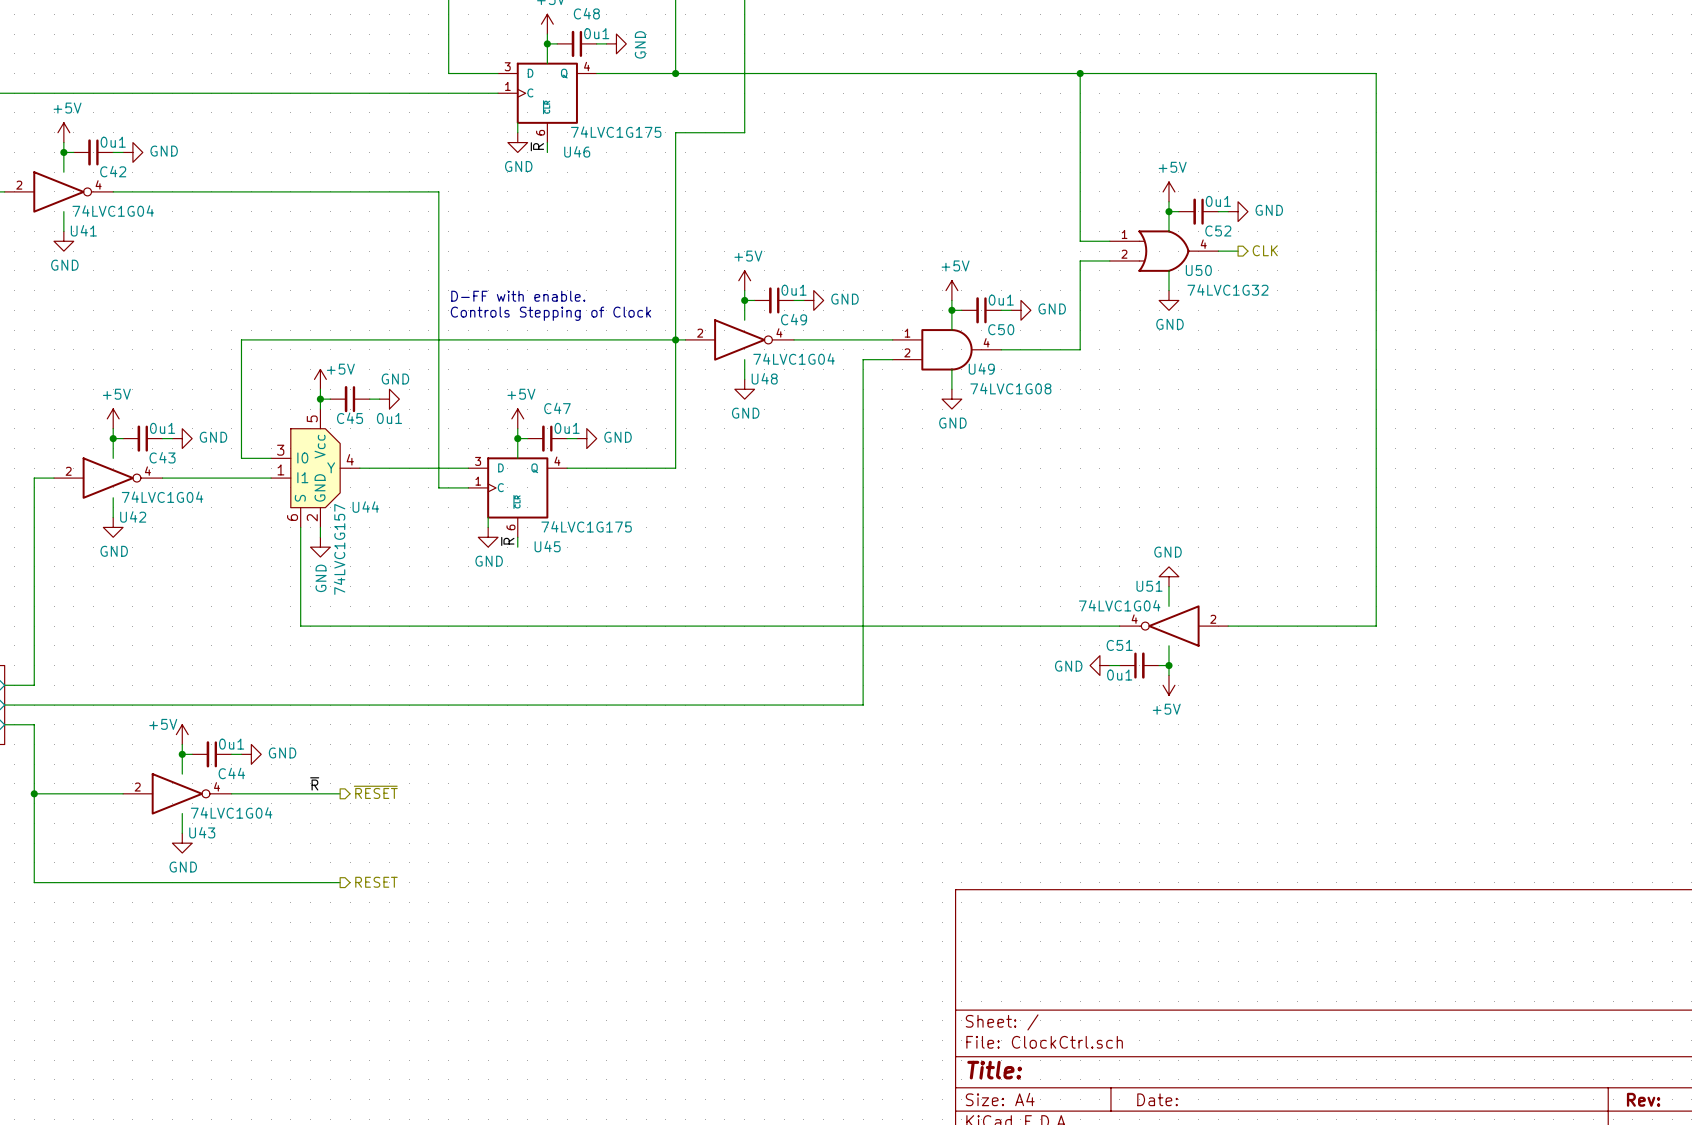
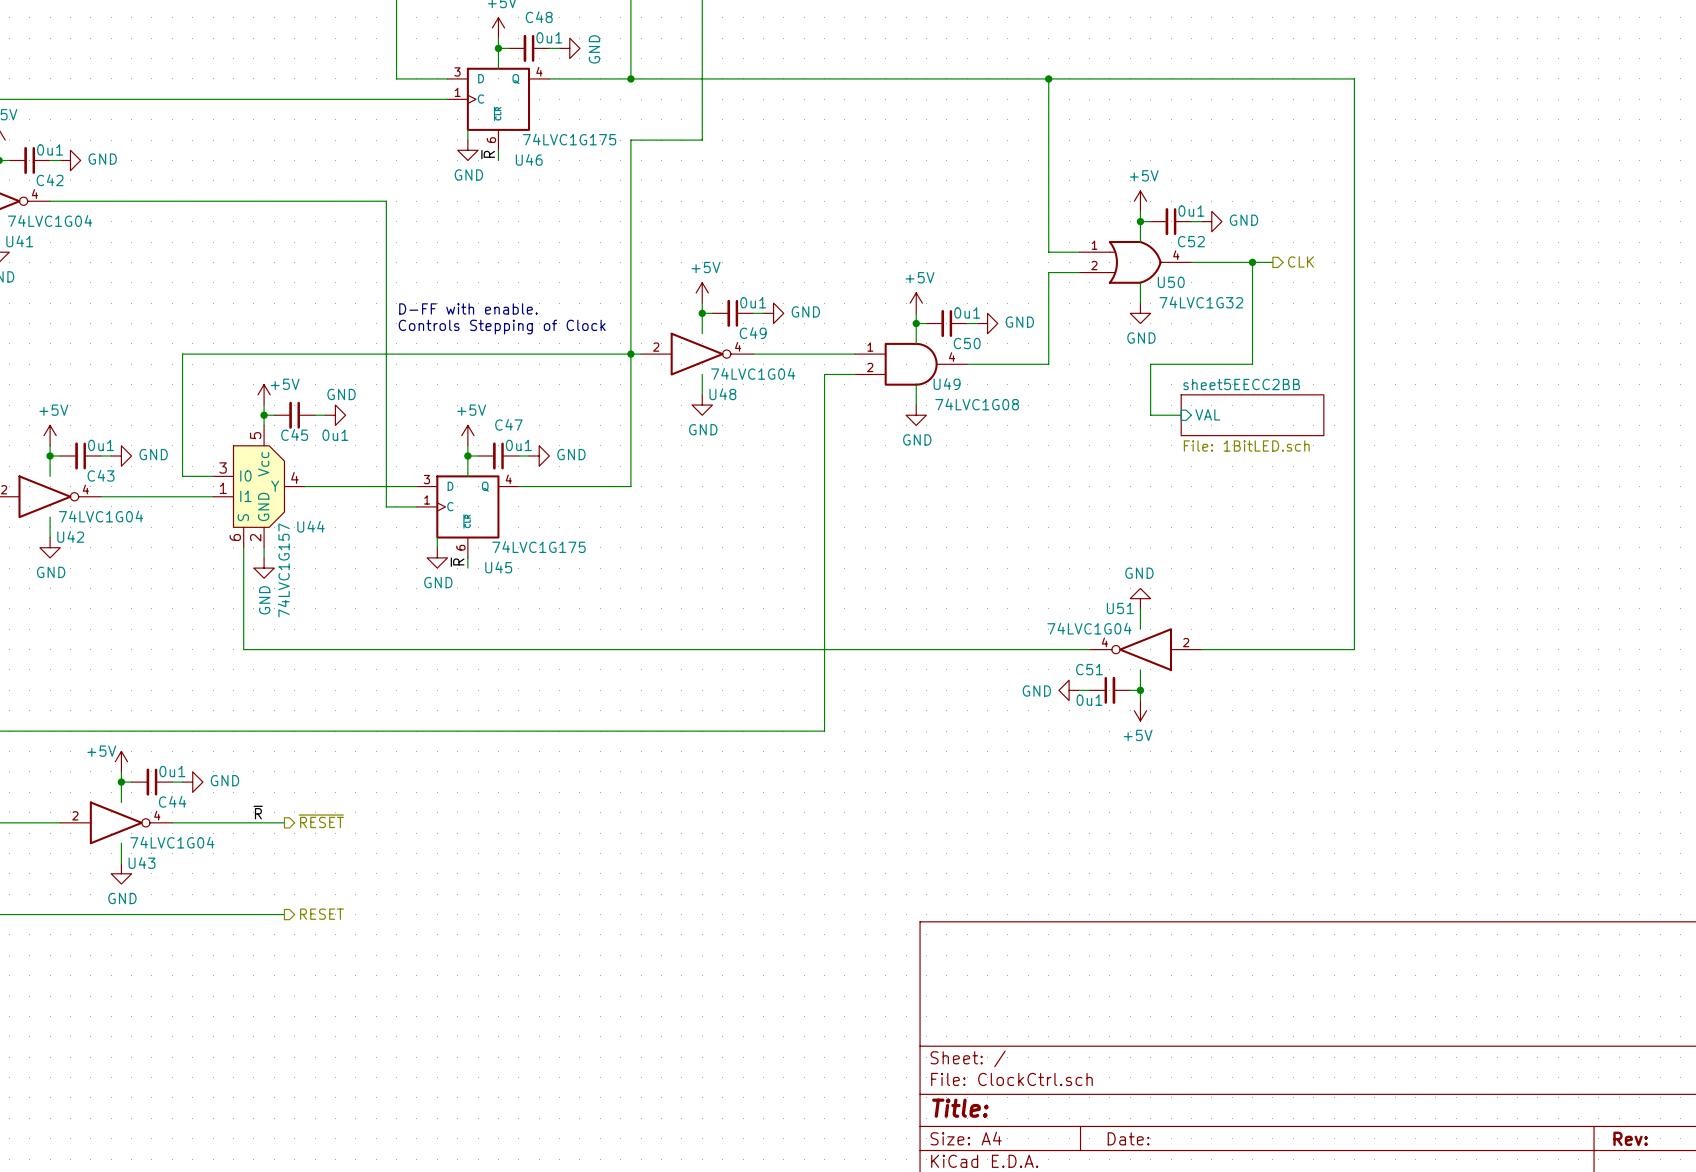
hierarchical label position: CLK (1265, 250) -> CLK (1300, 262)
wire: none -> (1211, 262) (1272, 262)
wire: none -> (1252, 262) (1252, 364) (1150, 364) (1150, 415) (1181, 415)
junction: none -> (1252, 262)
sheet pin: none -> VAL (1207, 414)
sheet sheet5EECC2BB: none -> File: 1BitLED.sch (1252, 415)

